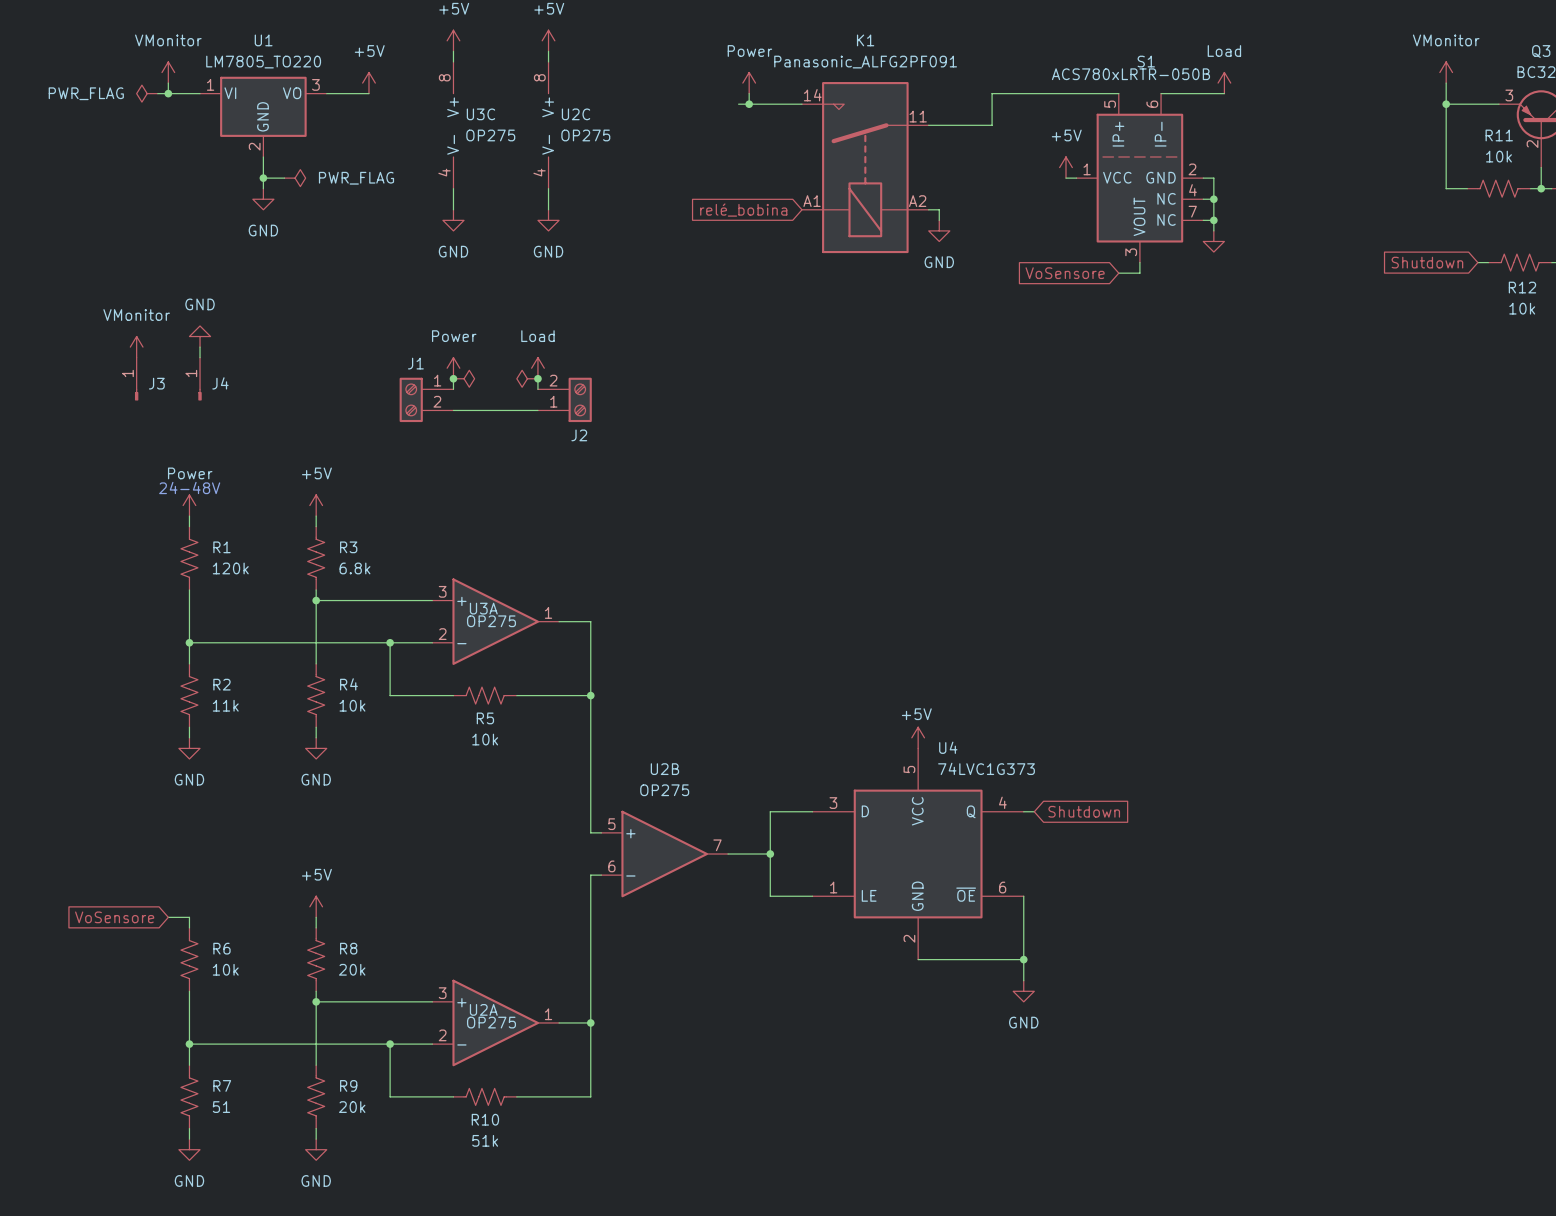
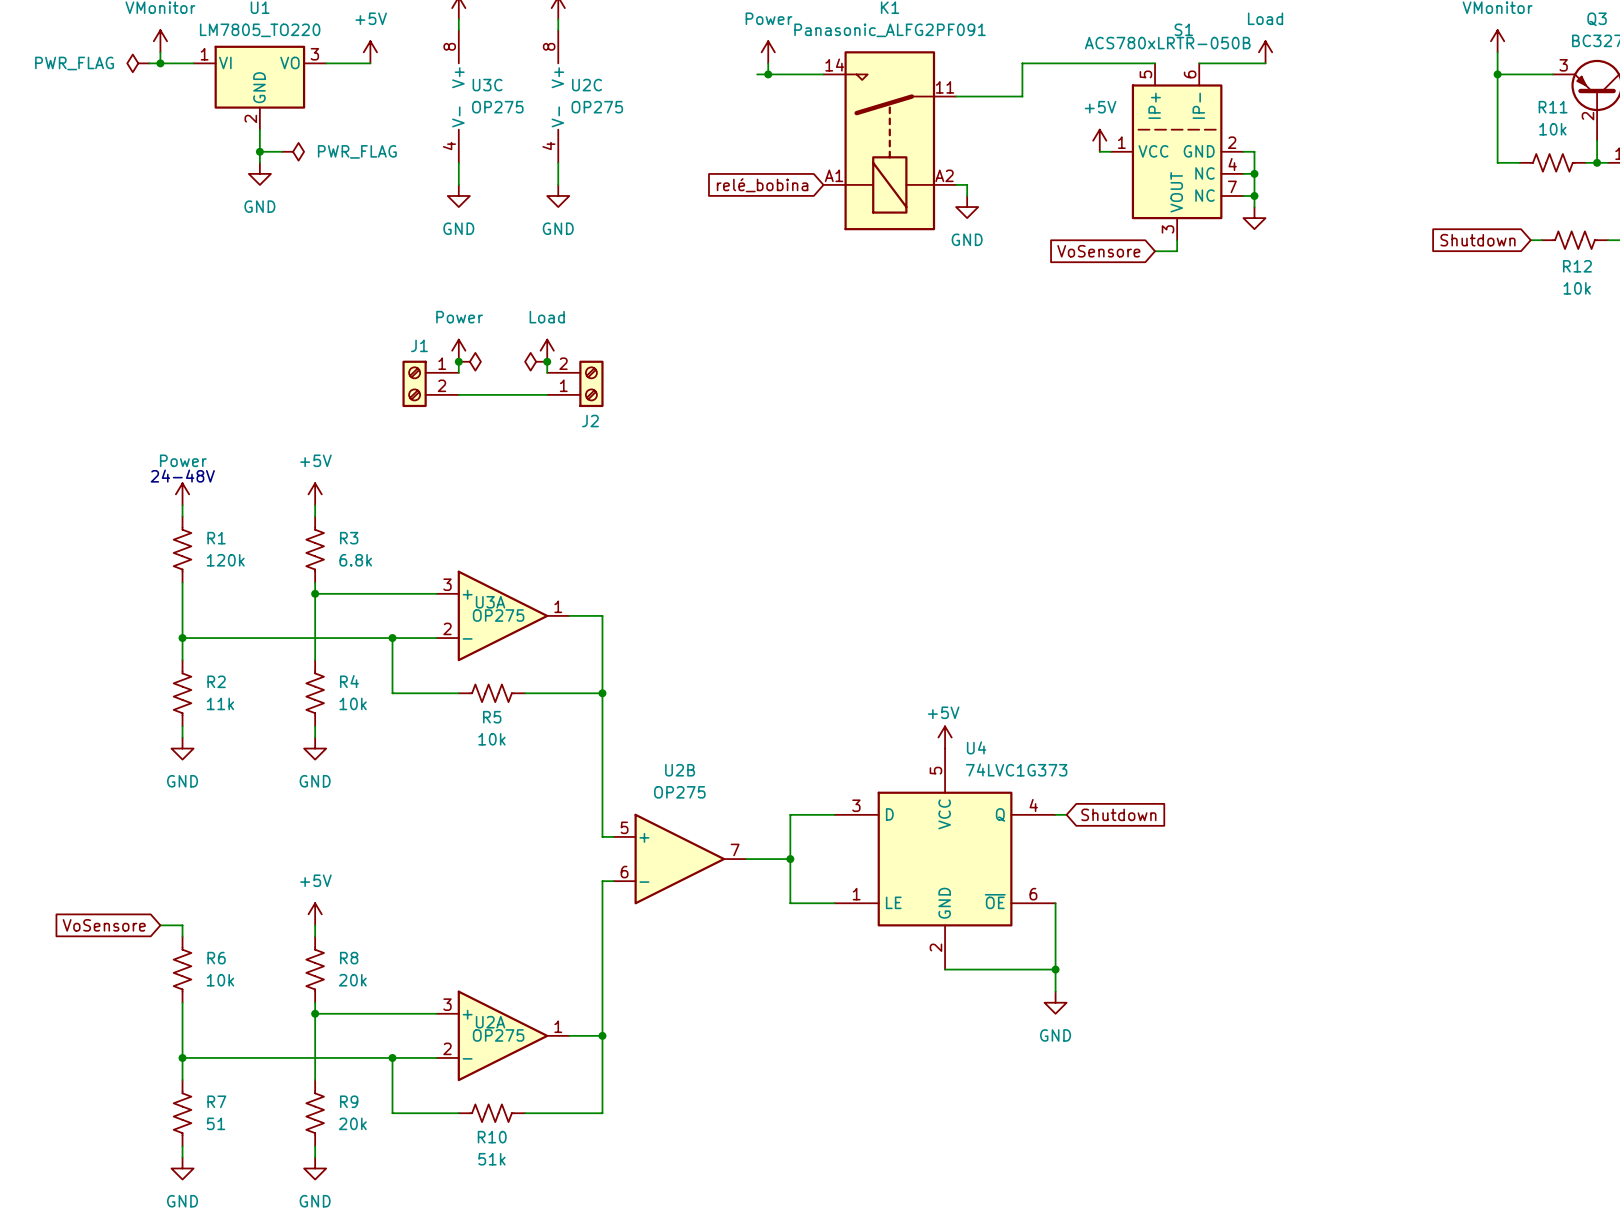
power symbol: GND (200, 336) -> none
power symbol: VMonitor (136, 347) -> none
wire: (200, 347) (200, 357) -> none
J3: (136, 379) -> none
J4: (200, 379) -> none

